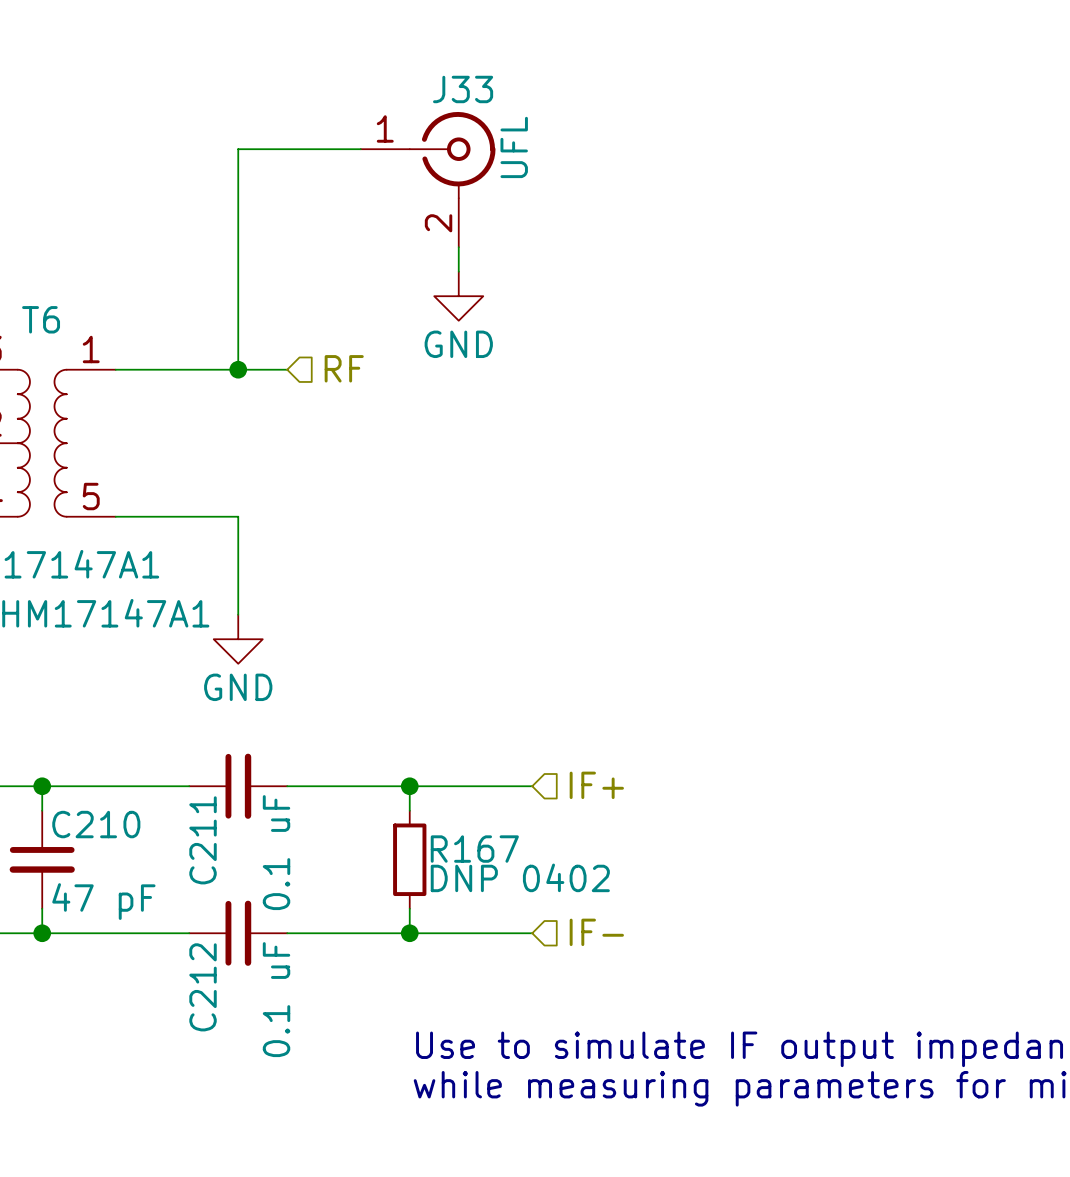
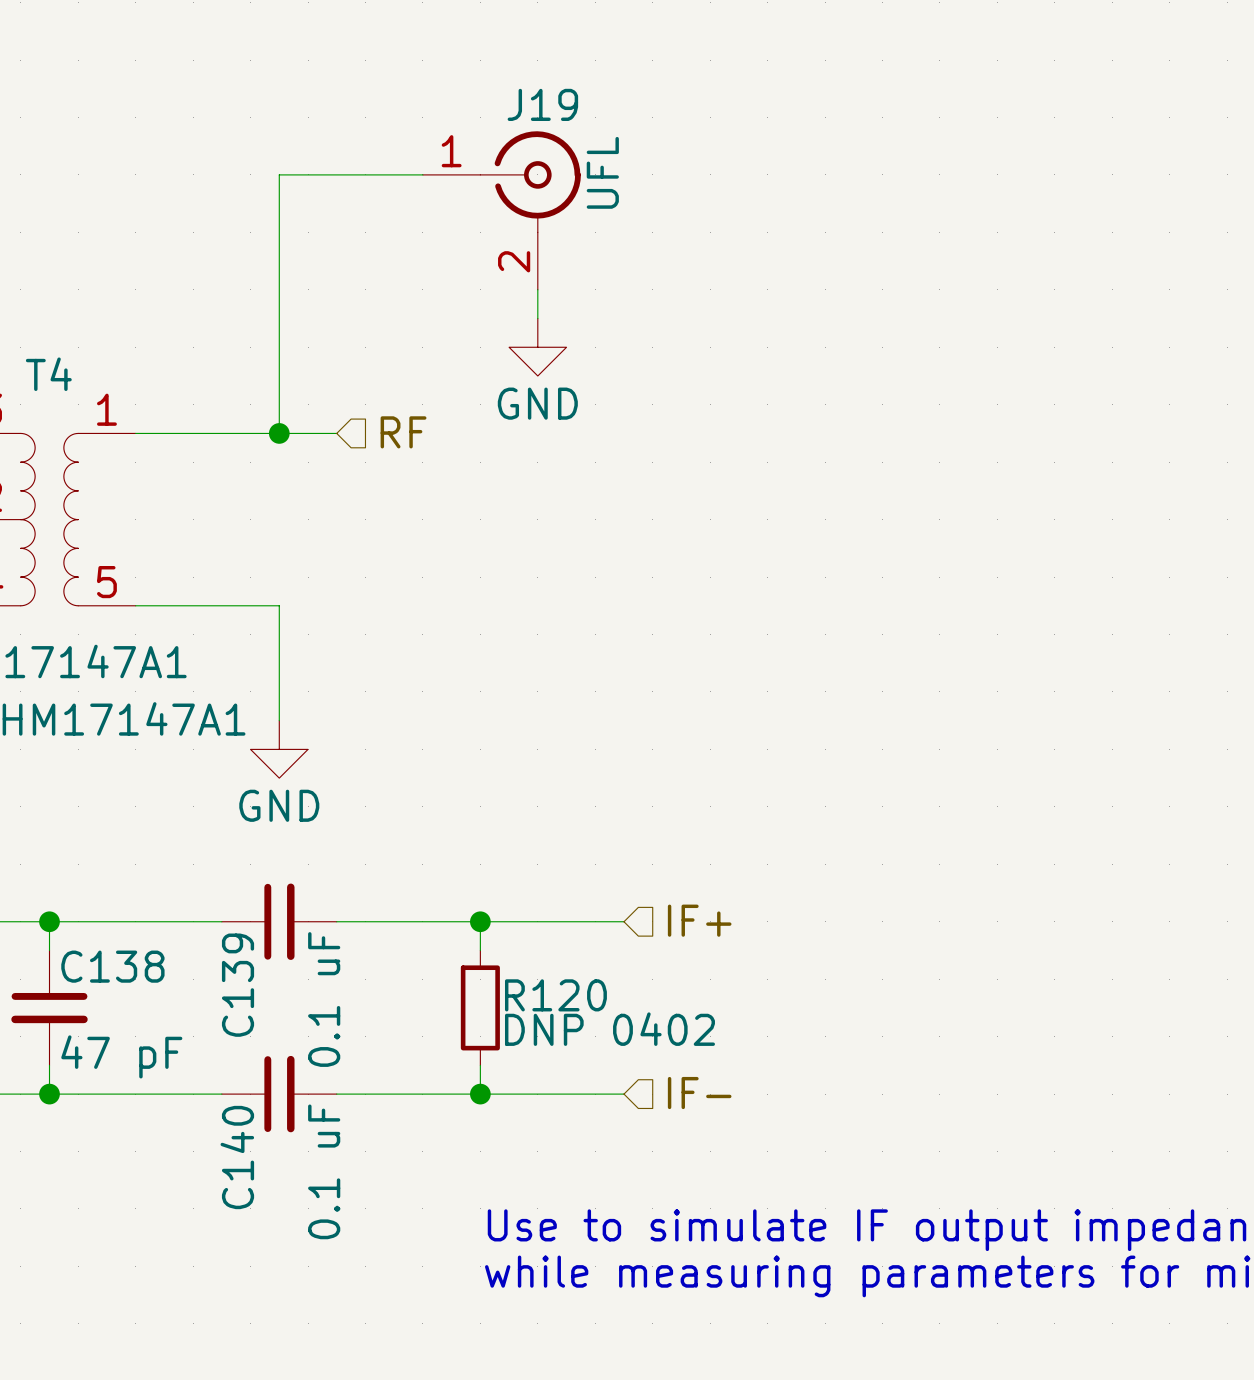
J33 name: J33 (463, 89) -> J19 (542, 104)
T6 name: T6 (41, 319) -> T4 (48, 374)
C210 name: C210 (96, 824) -> C138 (112, 966)
C211 name: C211 (203, 840) -> C139 (238, 985)
R167 name: R167 (474, 849) -> R120 (555, 995)
C212 name: C212 (203, 987) -> C140 (237, 1157)

